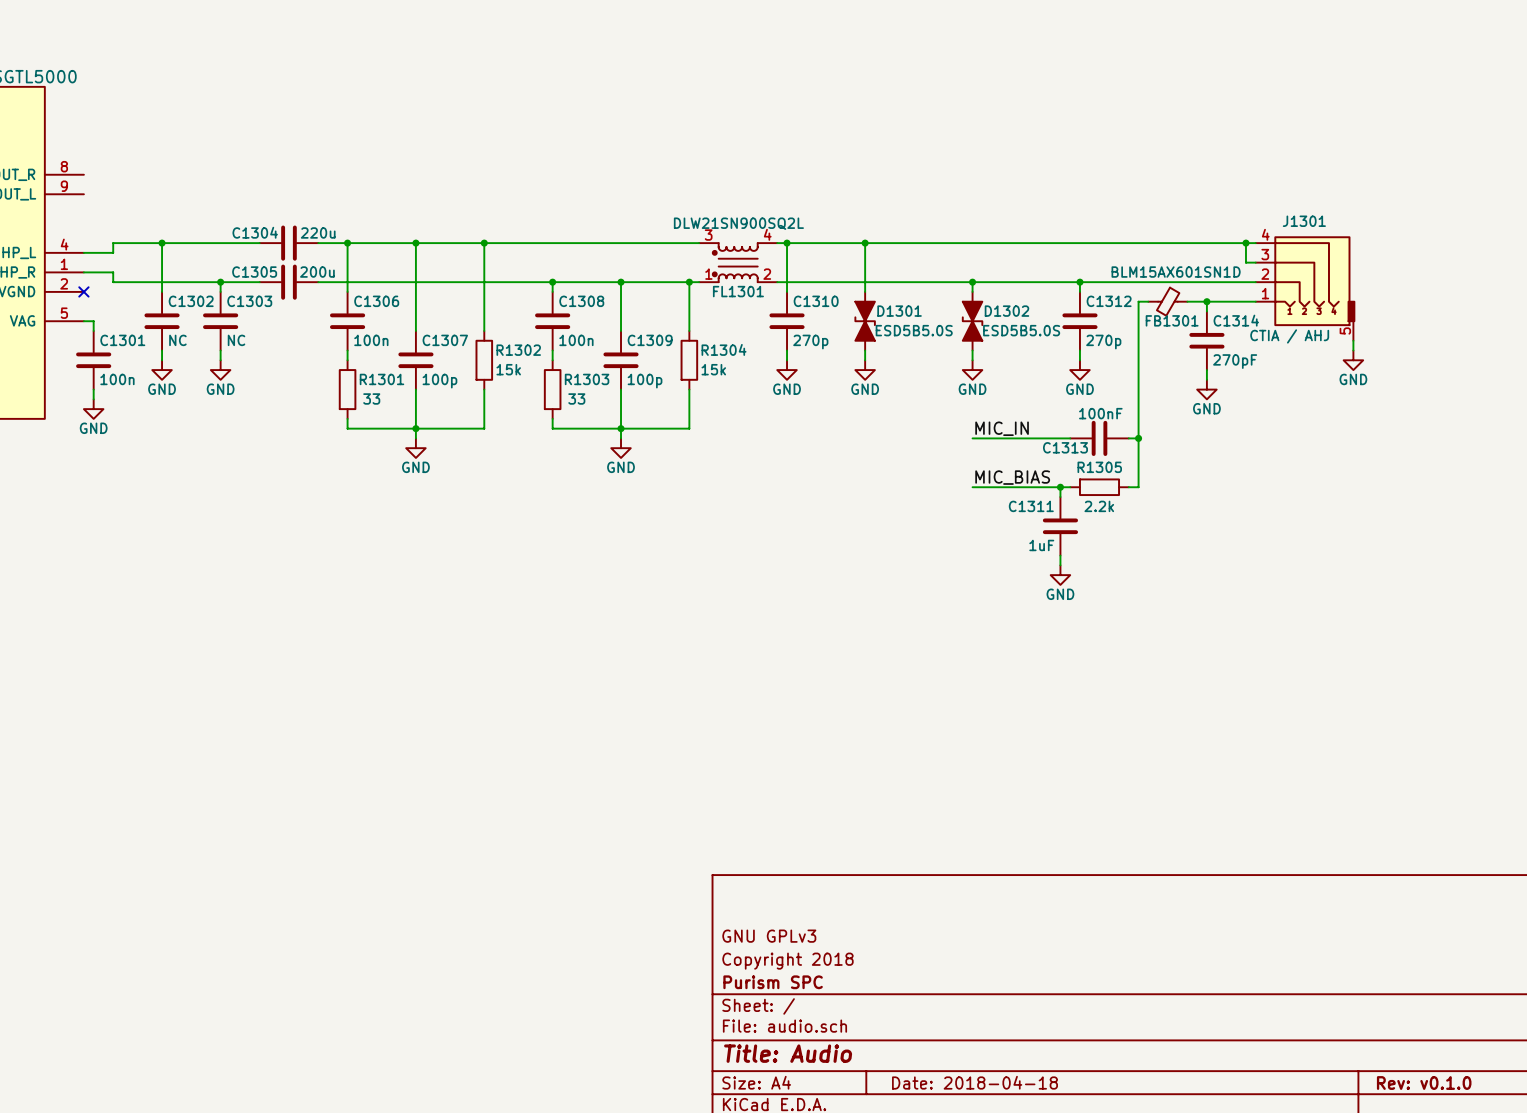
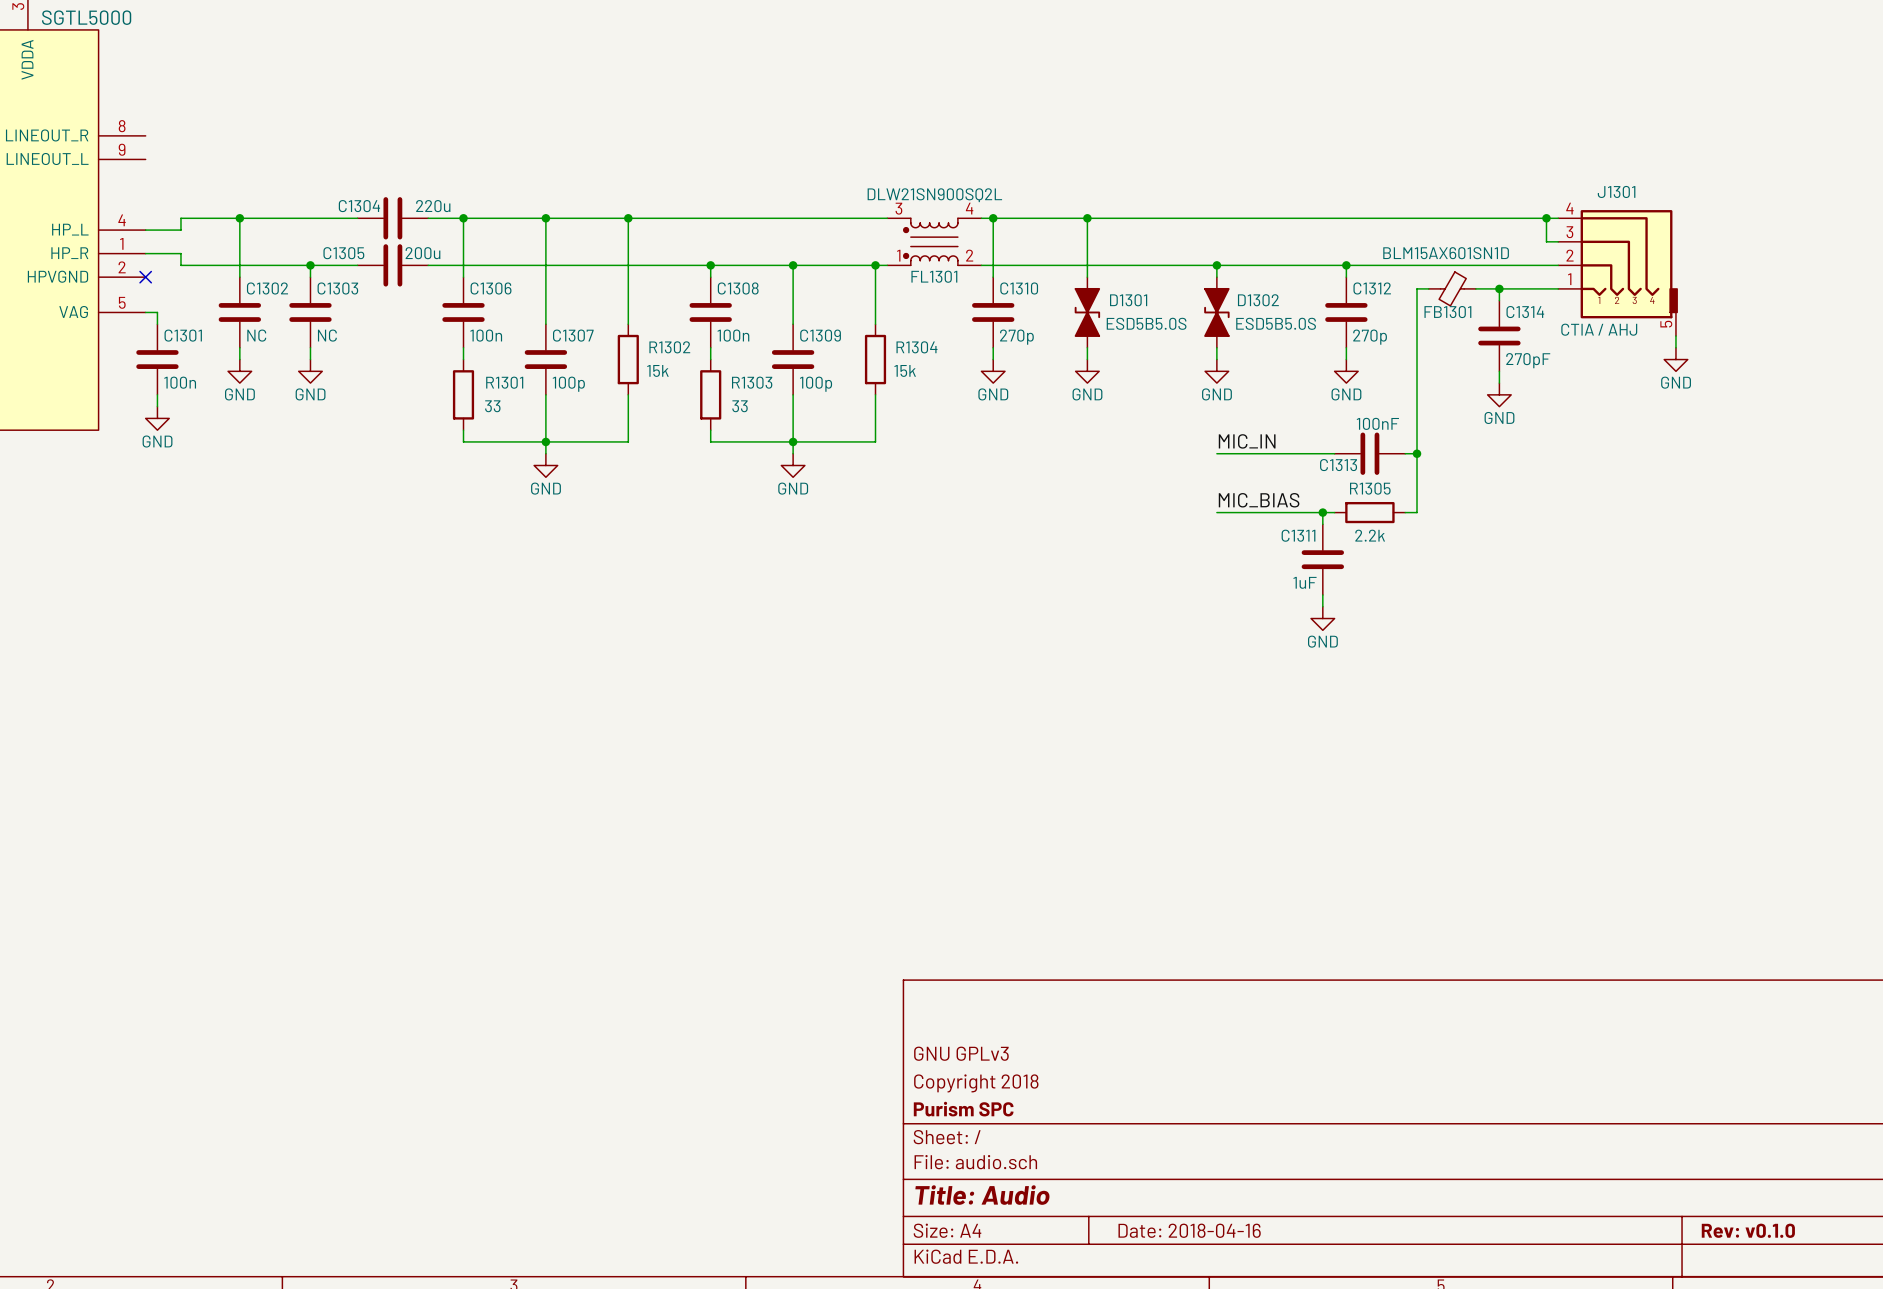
title block: Date: 2018-04-18 (975, 1082) -> Date: 2018-04-16 (1189, 1230)

